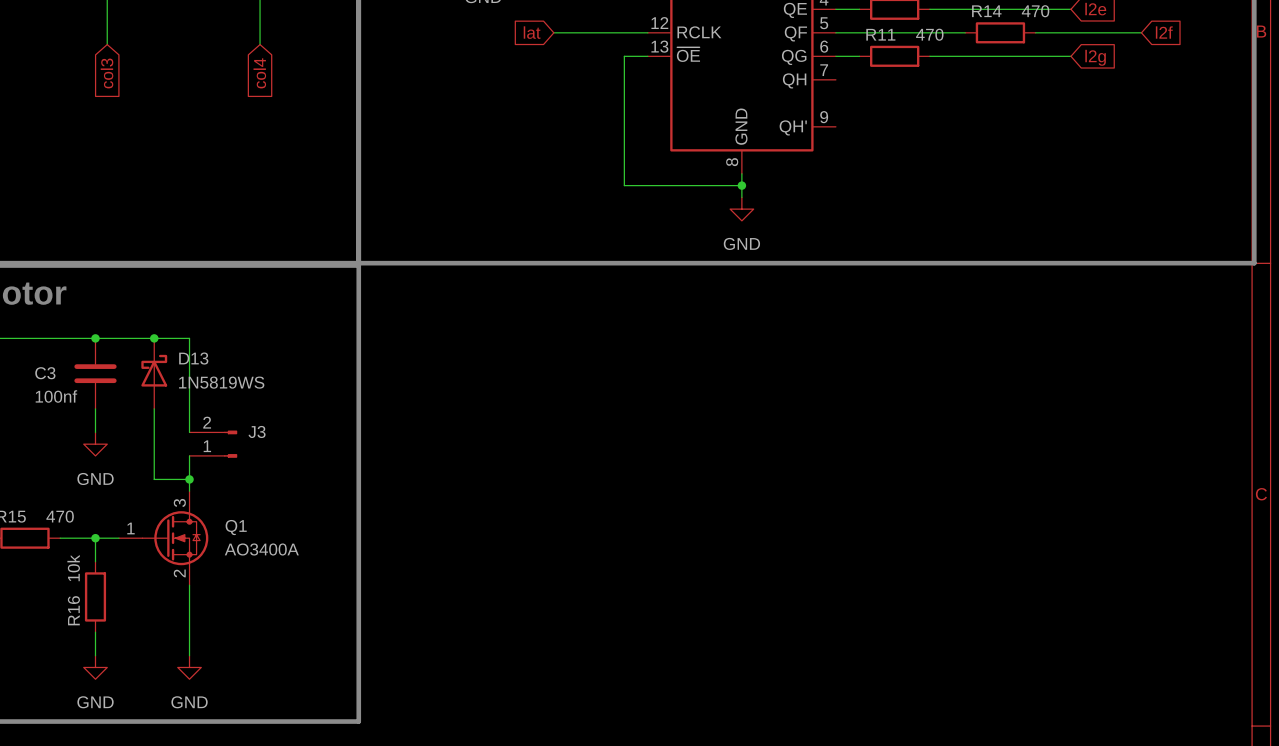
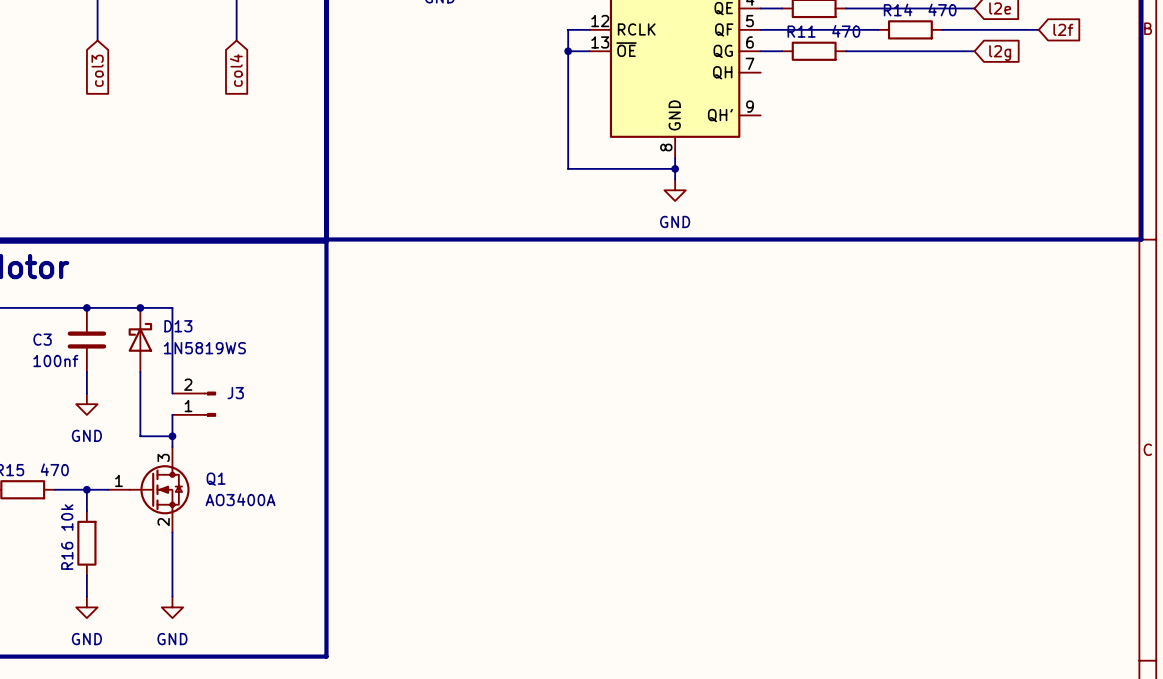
global label: lat (532, 32) -> none
wire: (553, 32) (624, 32) -> (568, 51) (568, 29)
junction: none -> (568, 51)

